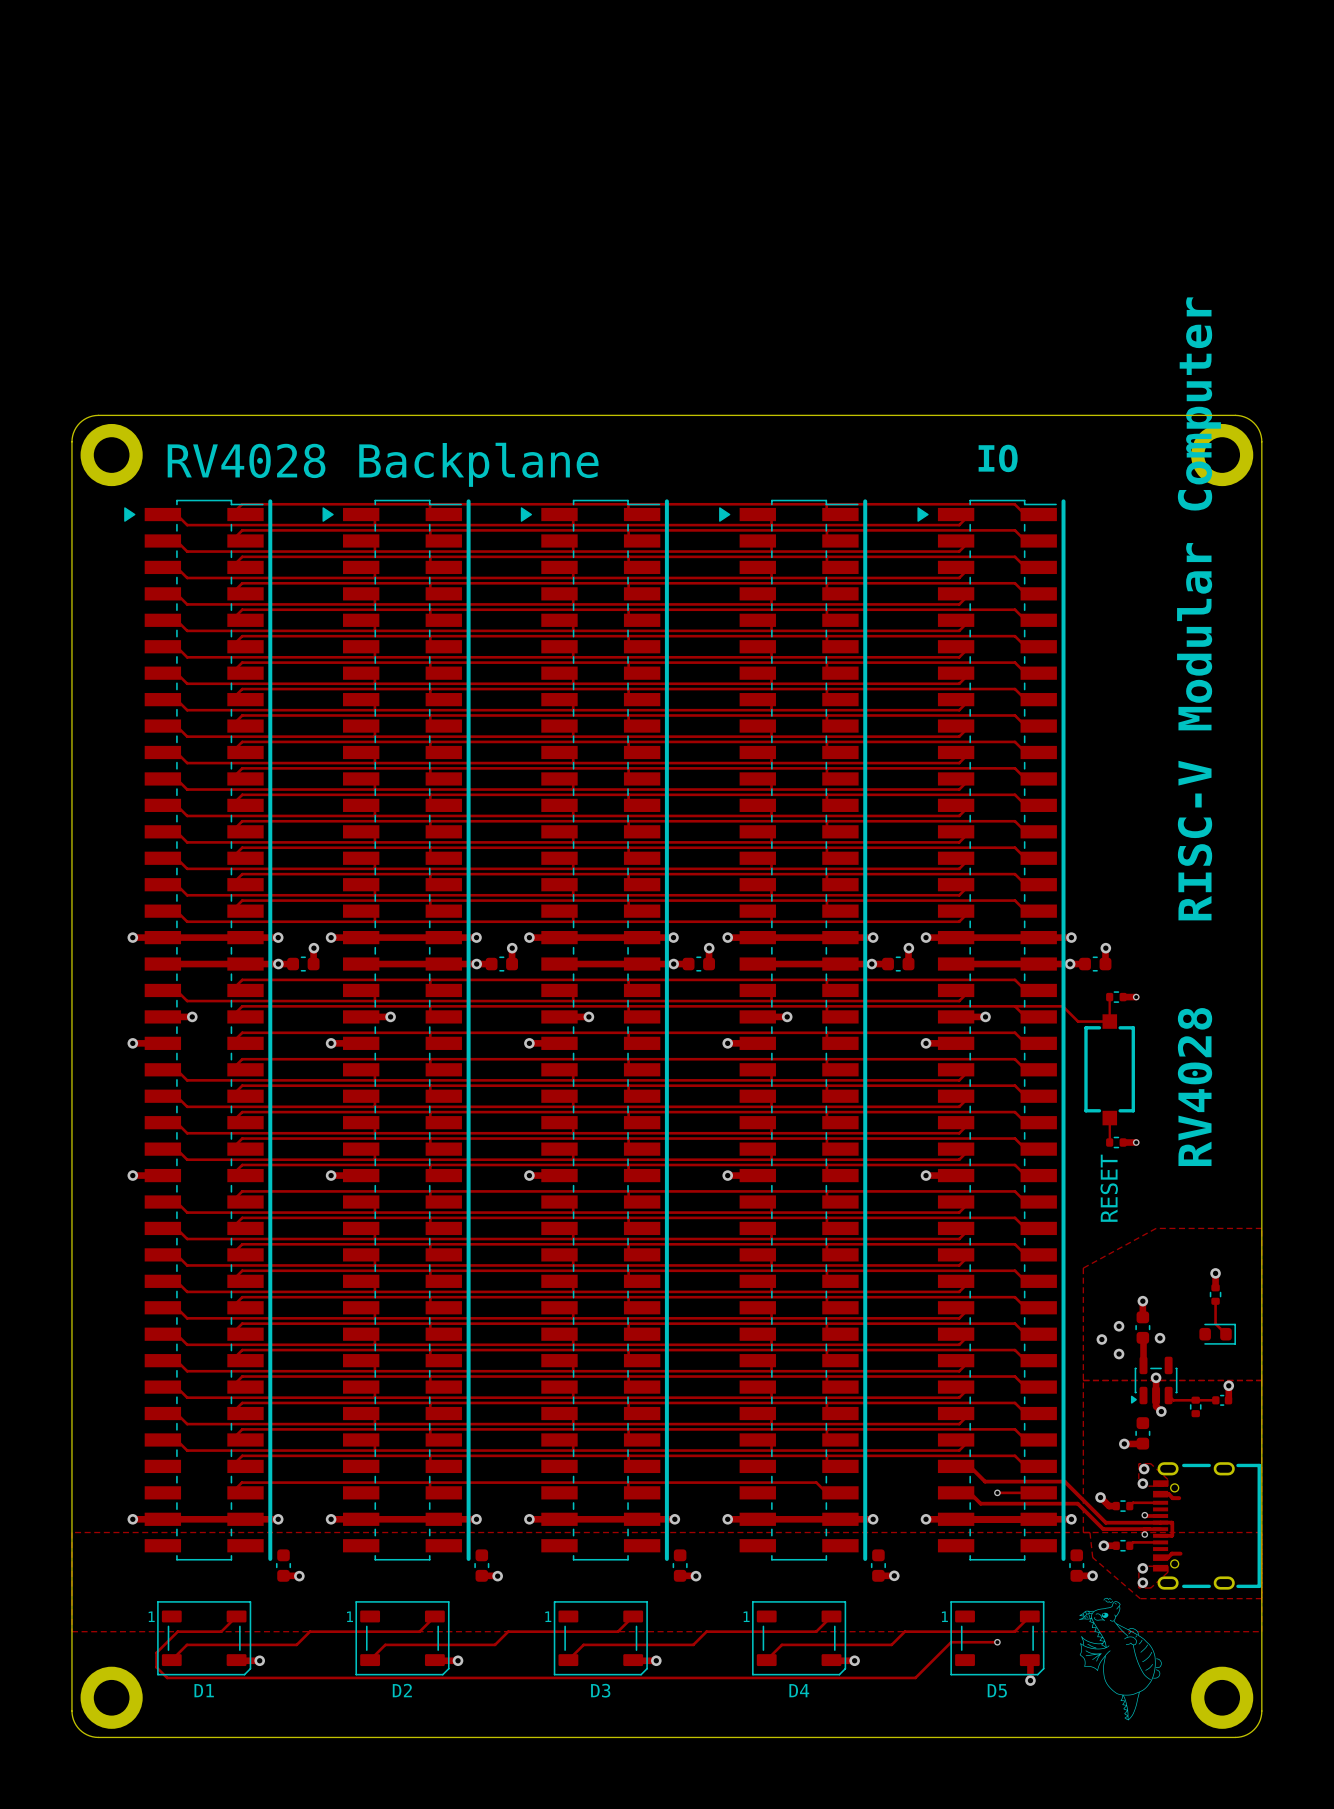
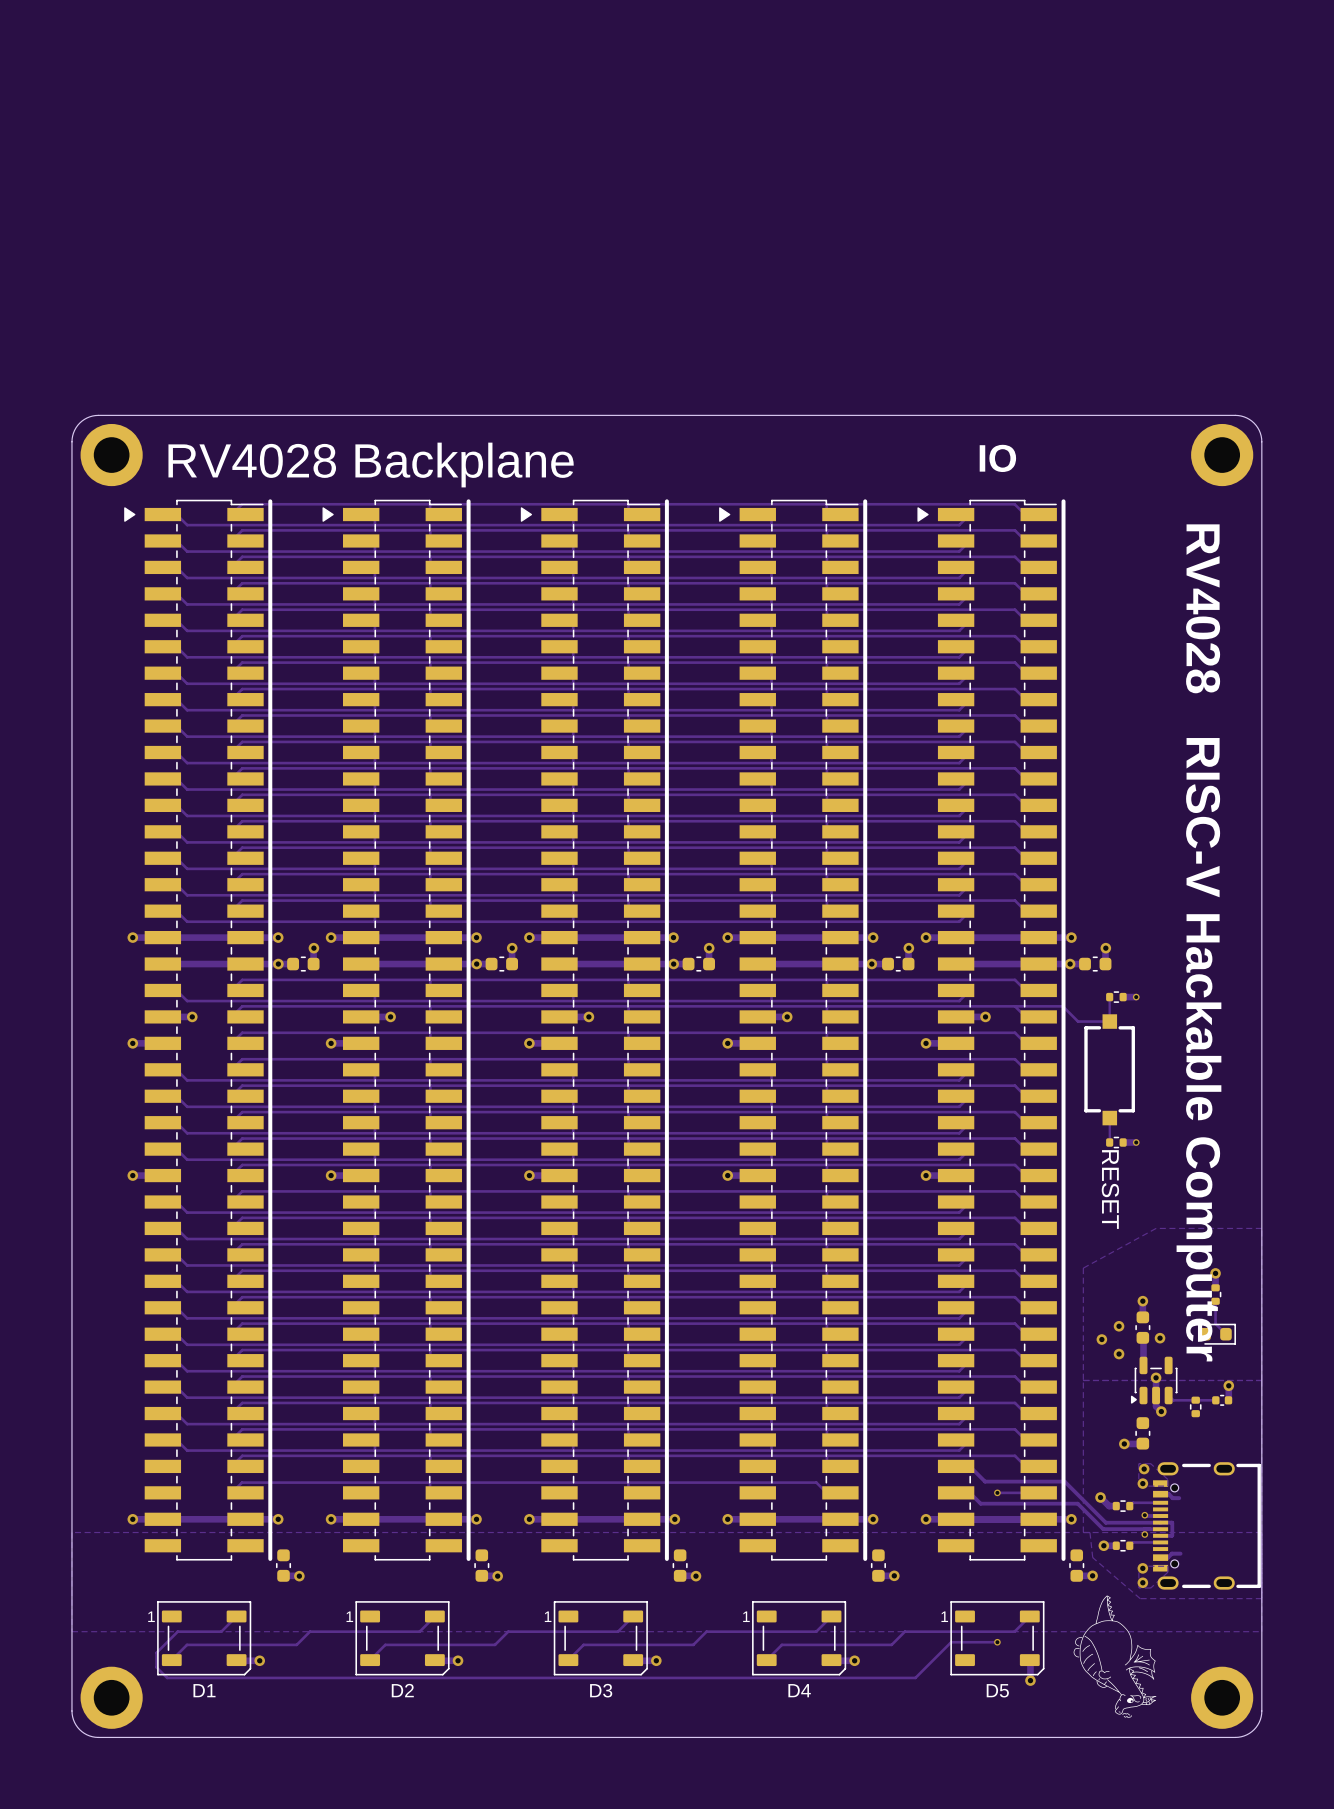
text: RV4028 RISC-V Modular Computer (1199, 731) -> none
text: none -> RV4028 RISC-V Hackable Computer (1198, 942)
part value rotation: 0° (1109, 1188) -> 180° (1110, 1189)
drawing: [1086, 1597, 1117, 1621] -> none
drawing shape: [1079, 1601, 1156, 1721] -> [1079, 1595, 1157, 1715]
drawing: none -> [1073, 1635, 1112, 1681]
drawing: [1124, 1635, 1162, 1680] -> none
drawing: [1085, 1644, 1102, 1662] -> none
drawing: none -> [1133, 1654, 1150, 1672]
drawing: none -> [1118, 1695, 1149, 1718]

